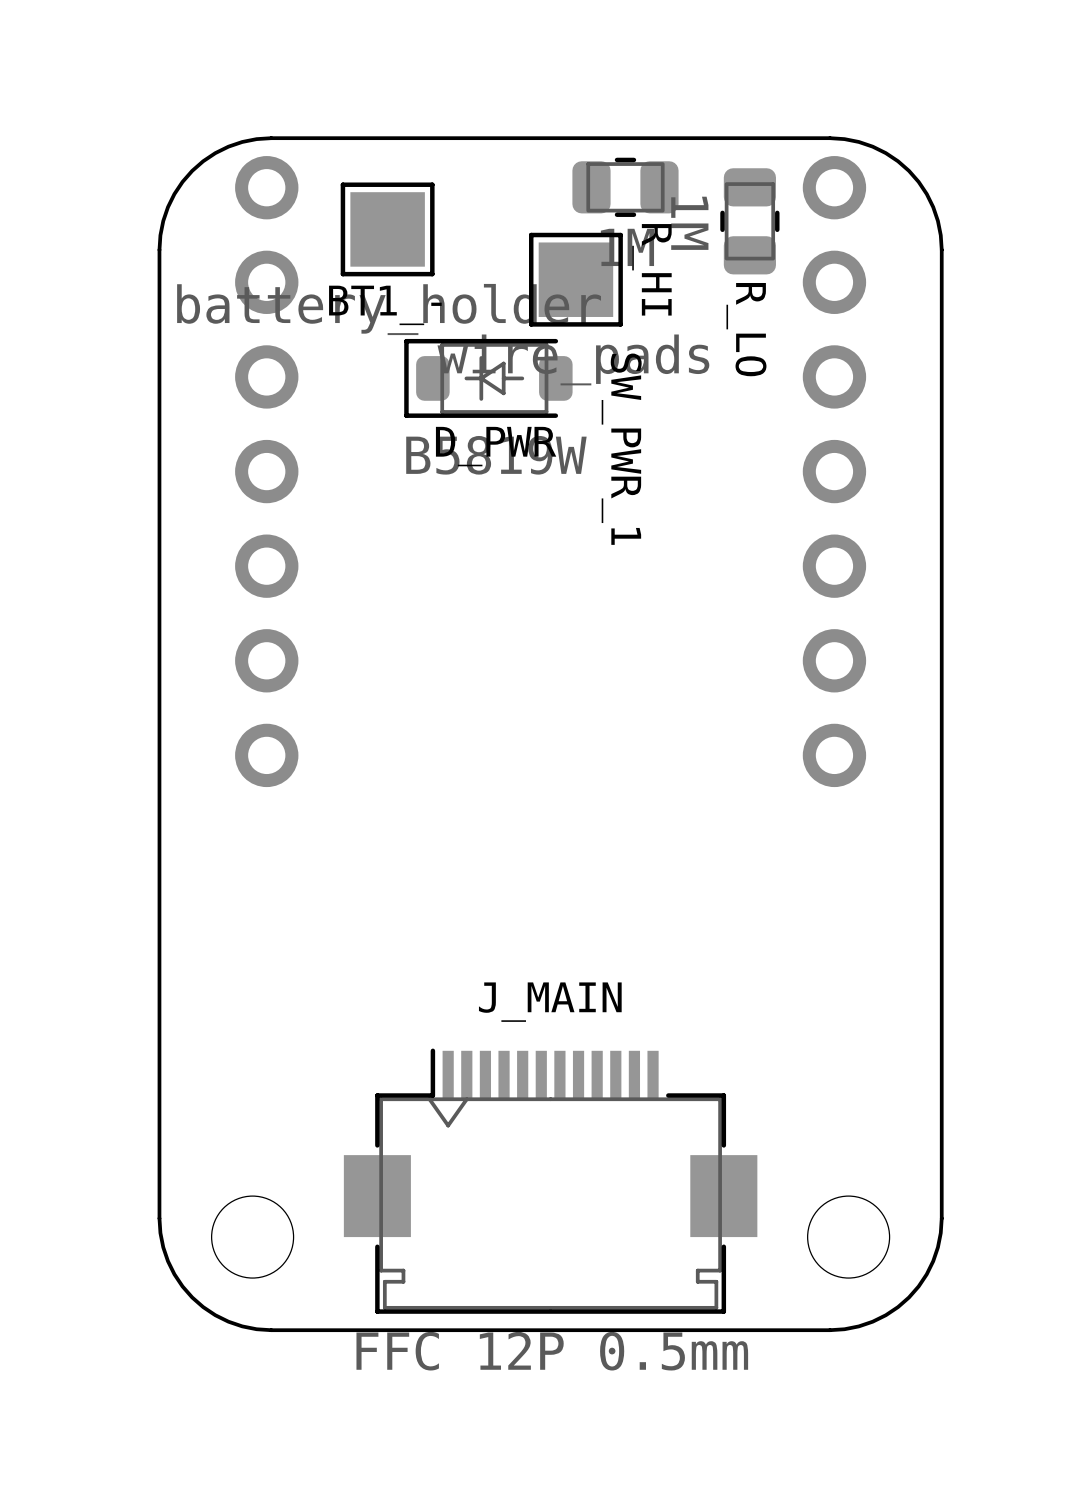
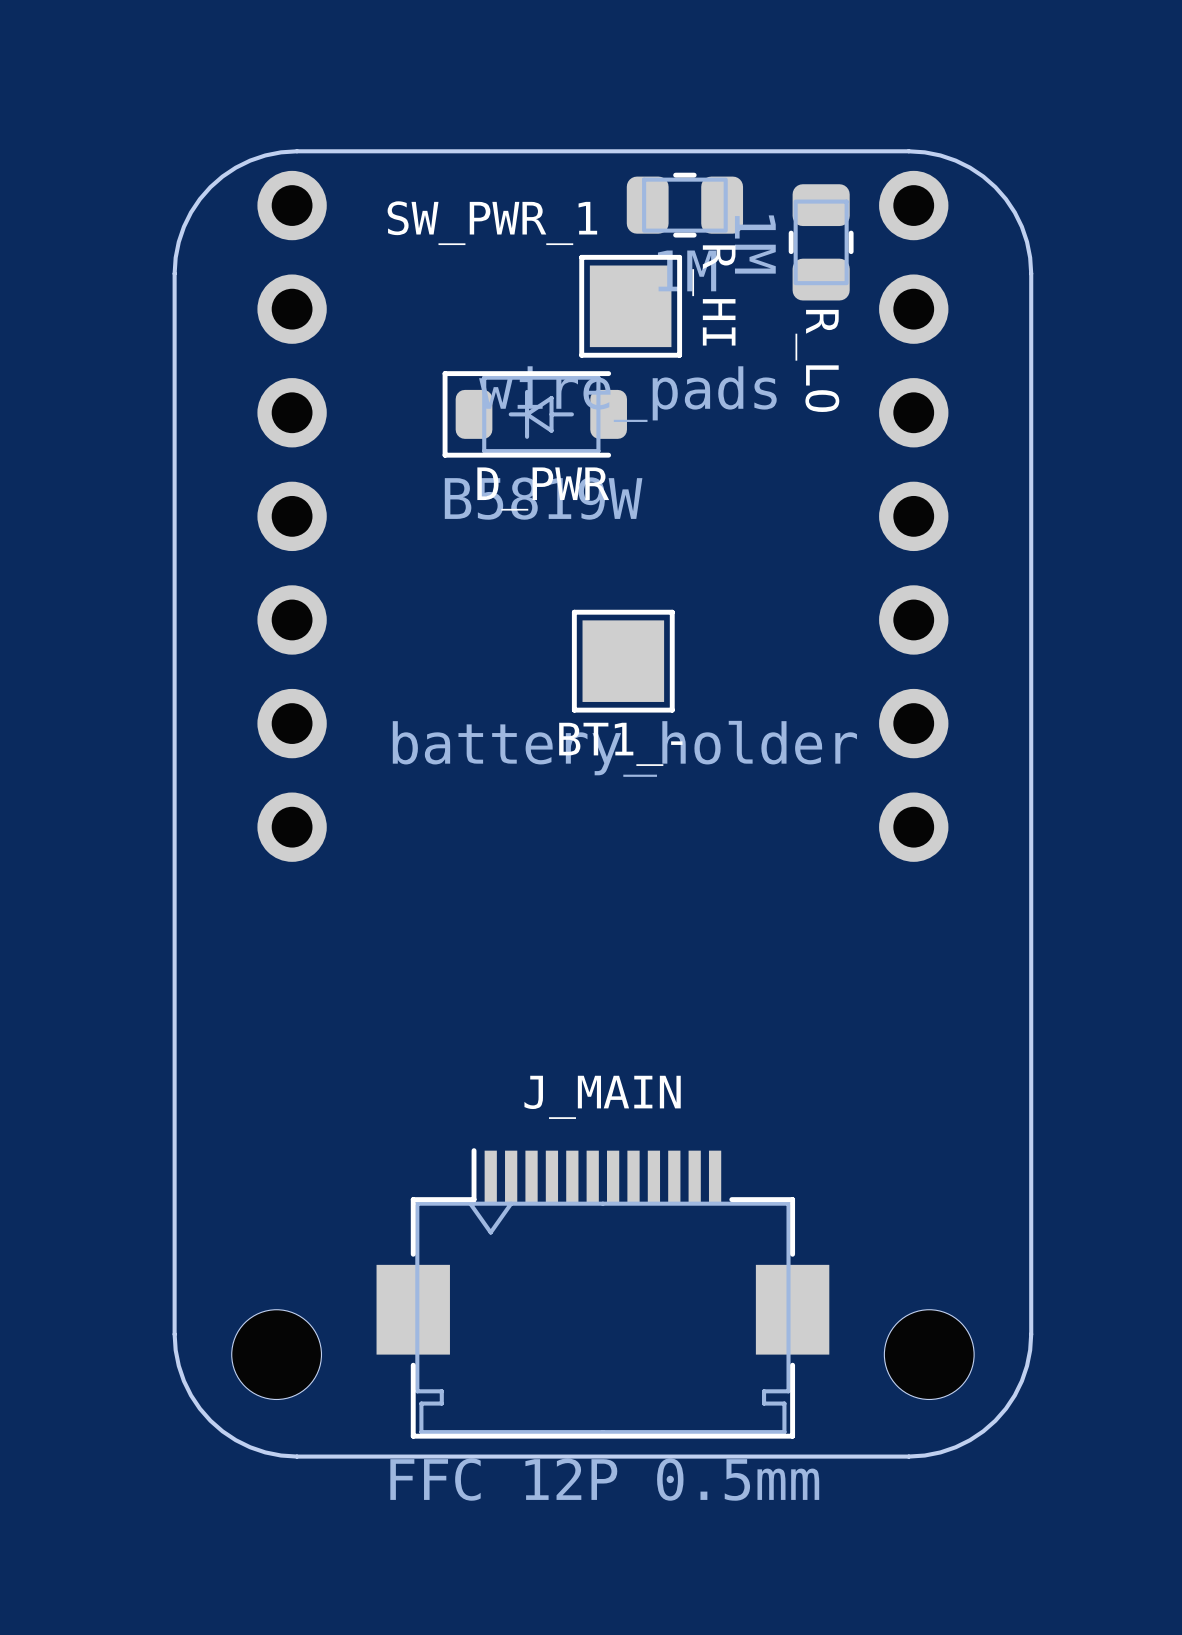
BT1_- position: (387, 229) -> (623, 661)
SW_PWR_1 name rotation: 0° (621, 449) -> 90° counterclockwise (492, 223)
SW_PWR_1 name position: SW_PWR_1 (621, 449) -> SW_PWR_1 (492, 223)

